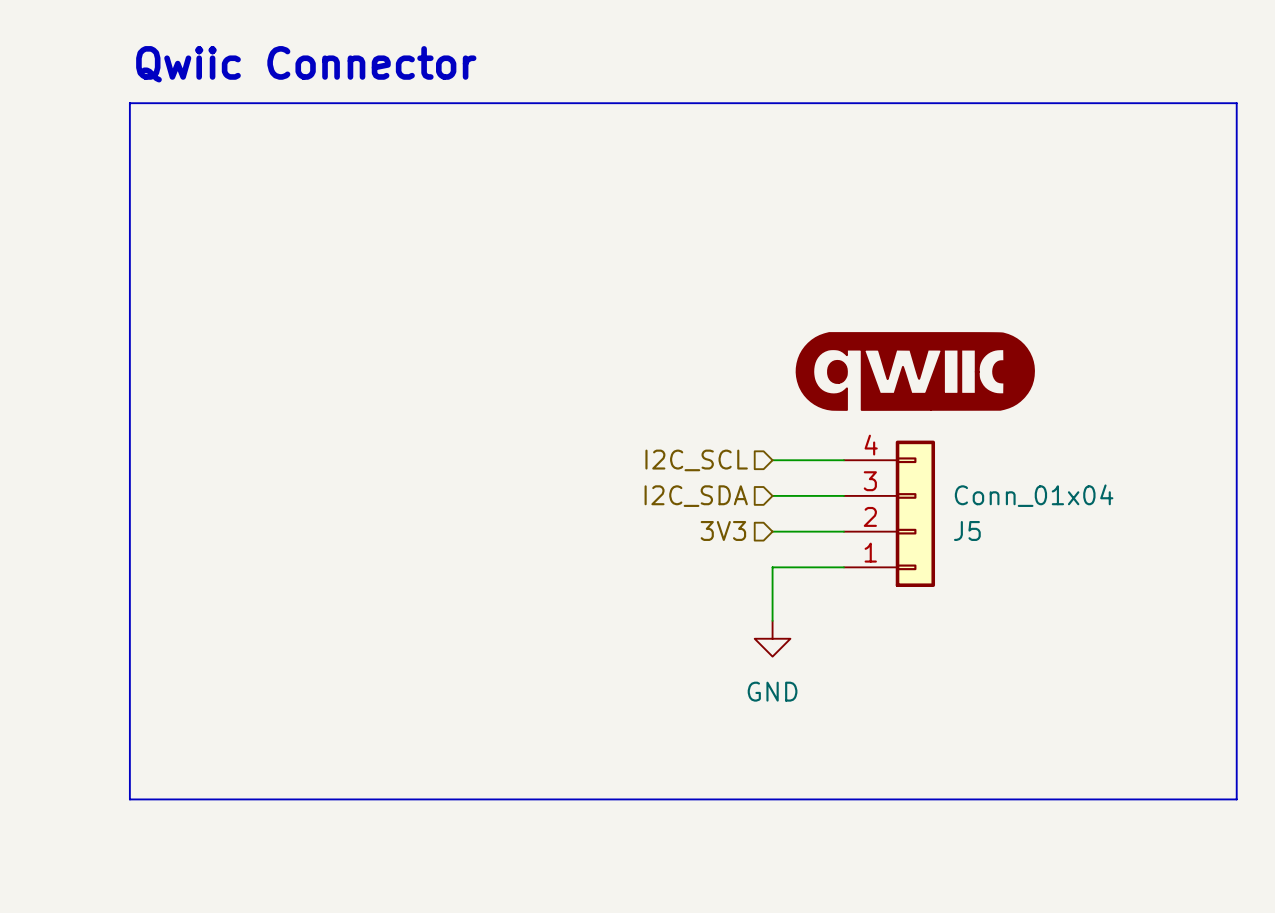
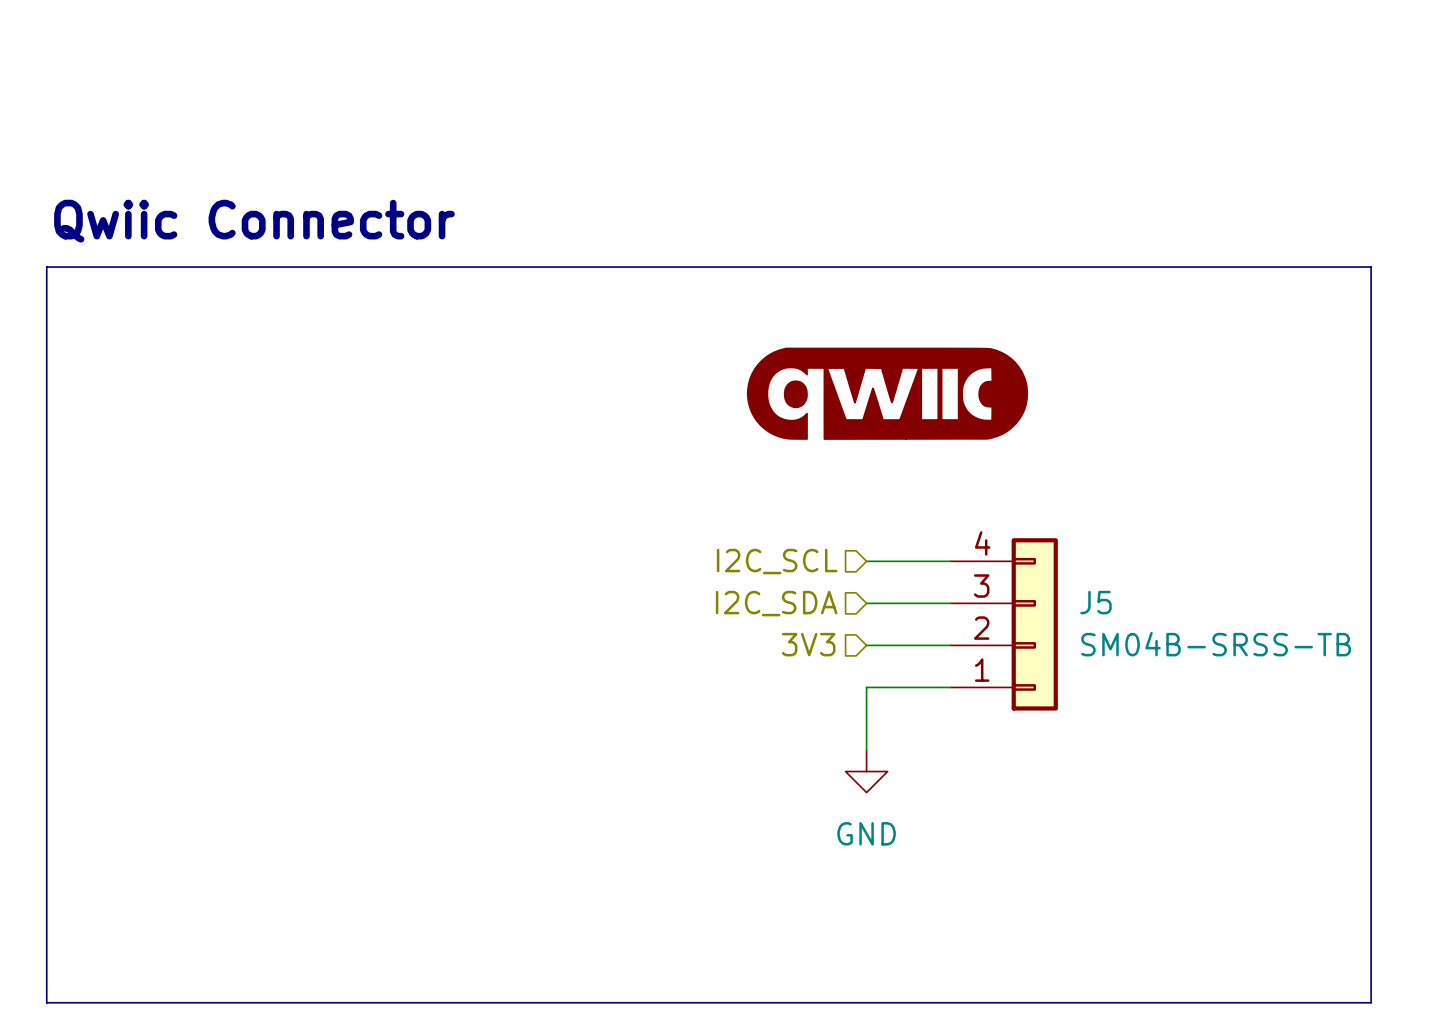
text position: Qwiic Connector (306, 64) -> Qwiic Connector (254, 221)
line: (129, 103) (1236, 103) (1236, 799) (129, 799) (129, 103) -> (46, 267) (46, 1002) (1371, 1002) (1371, 267) (46, 267)
part position: (915, 371) -> (887, 393)
J5 value: Conn_01x04 (1034, 495) -> SM04B-SRSS-TB (1216, 644)
J5 name position: J5 (967, 530) -> J5 (1095, 602)

